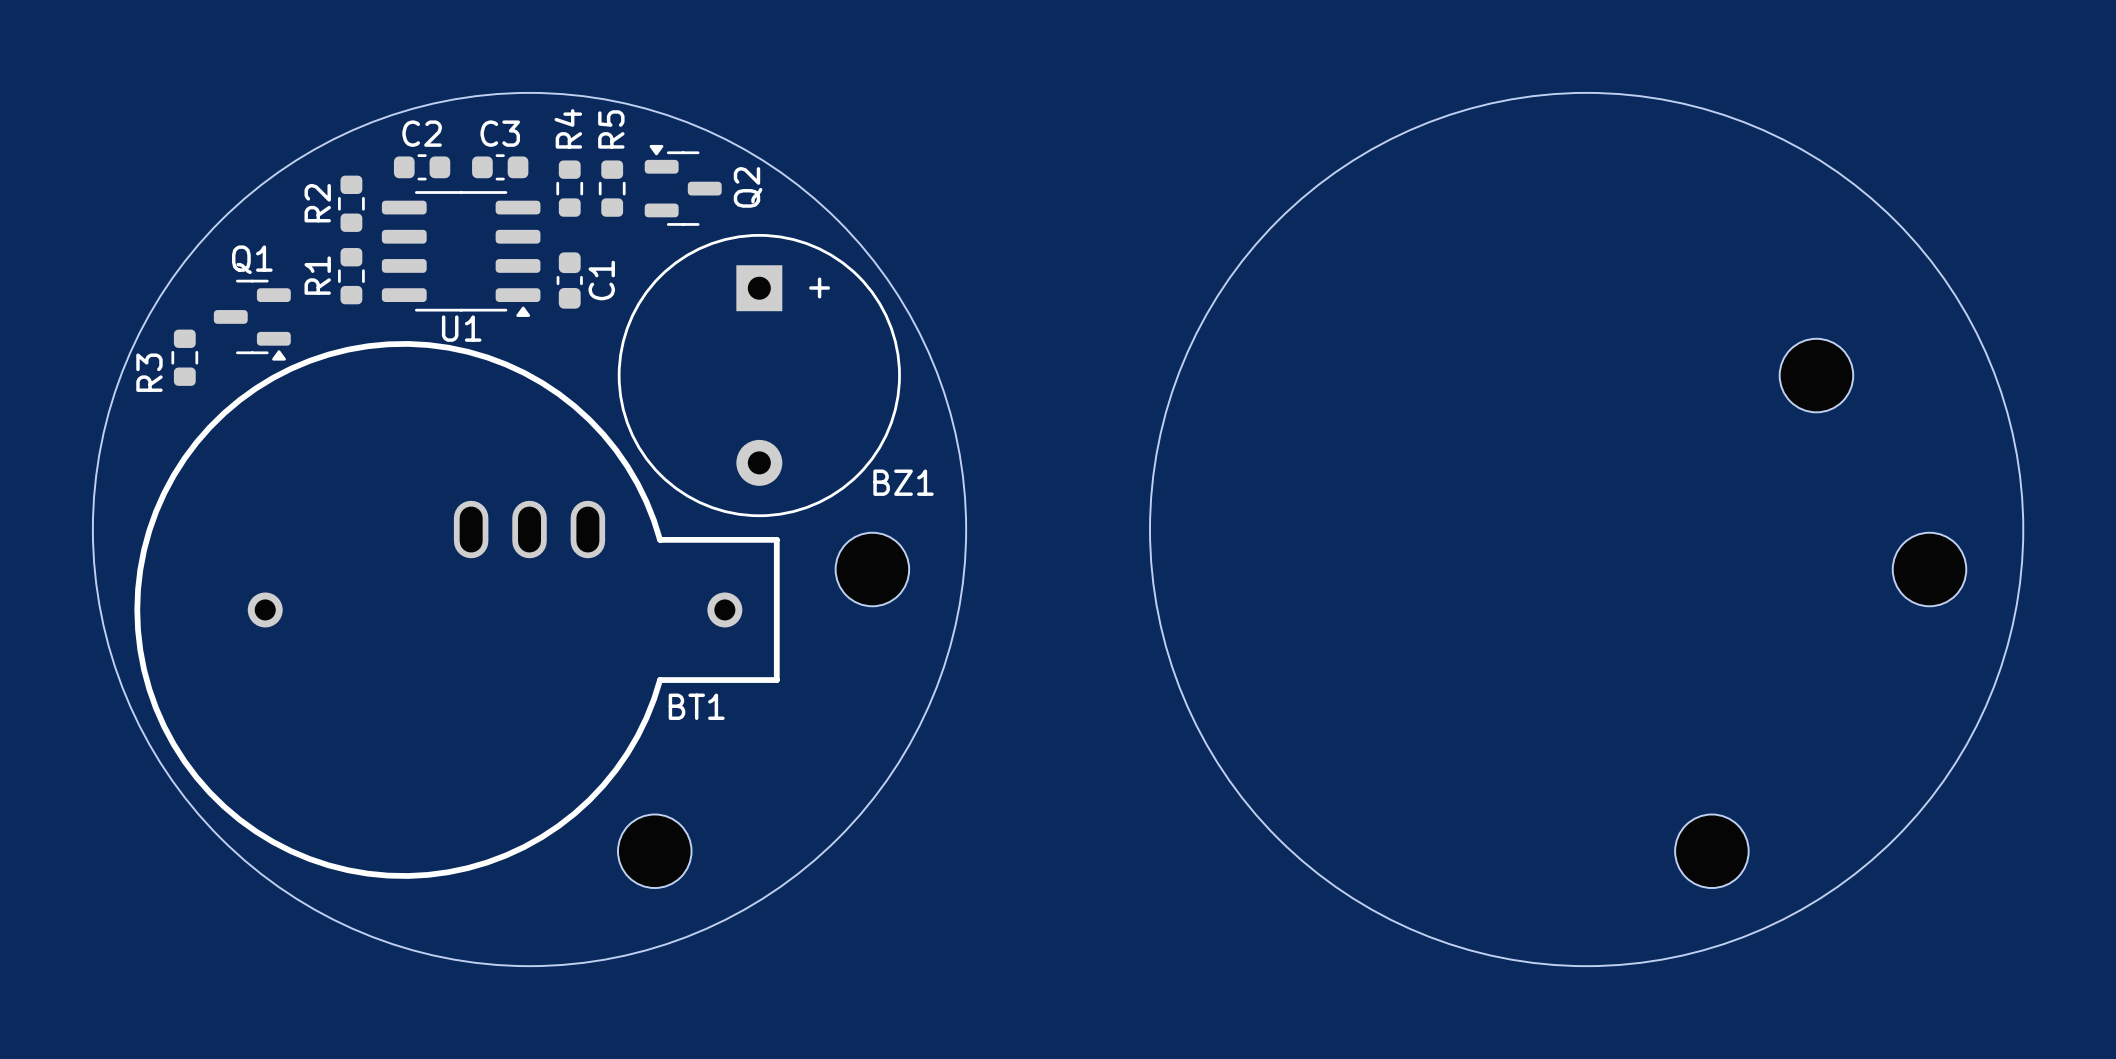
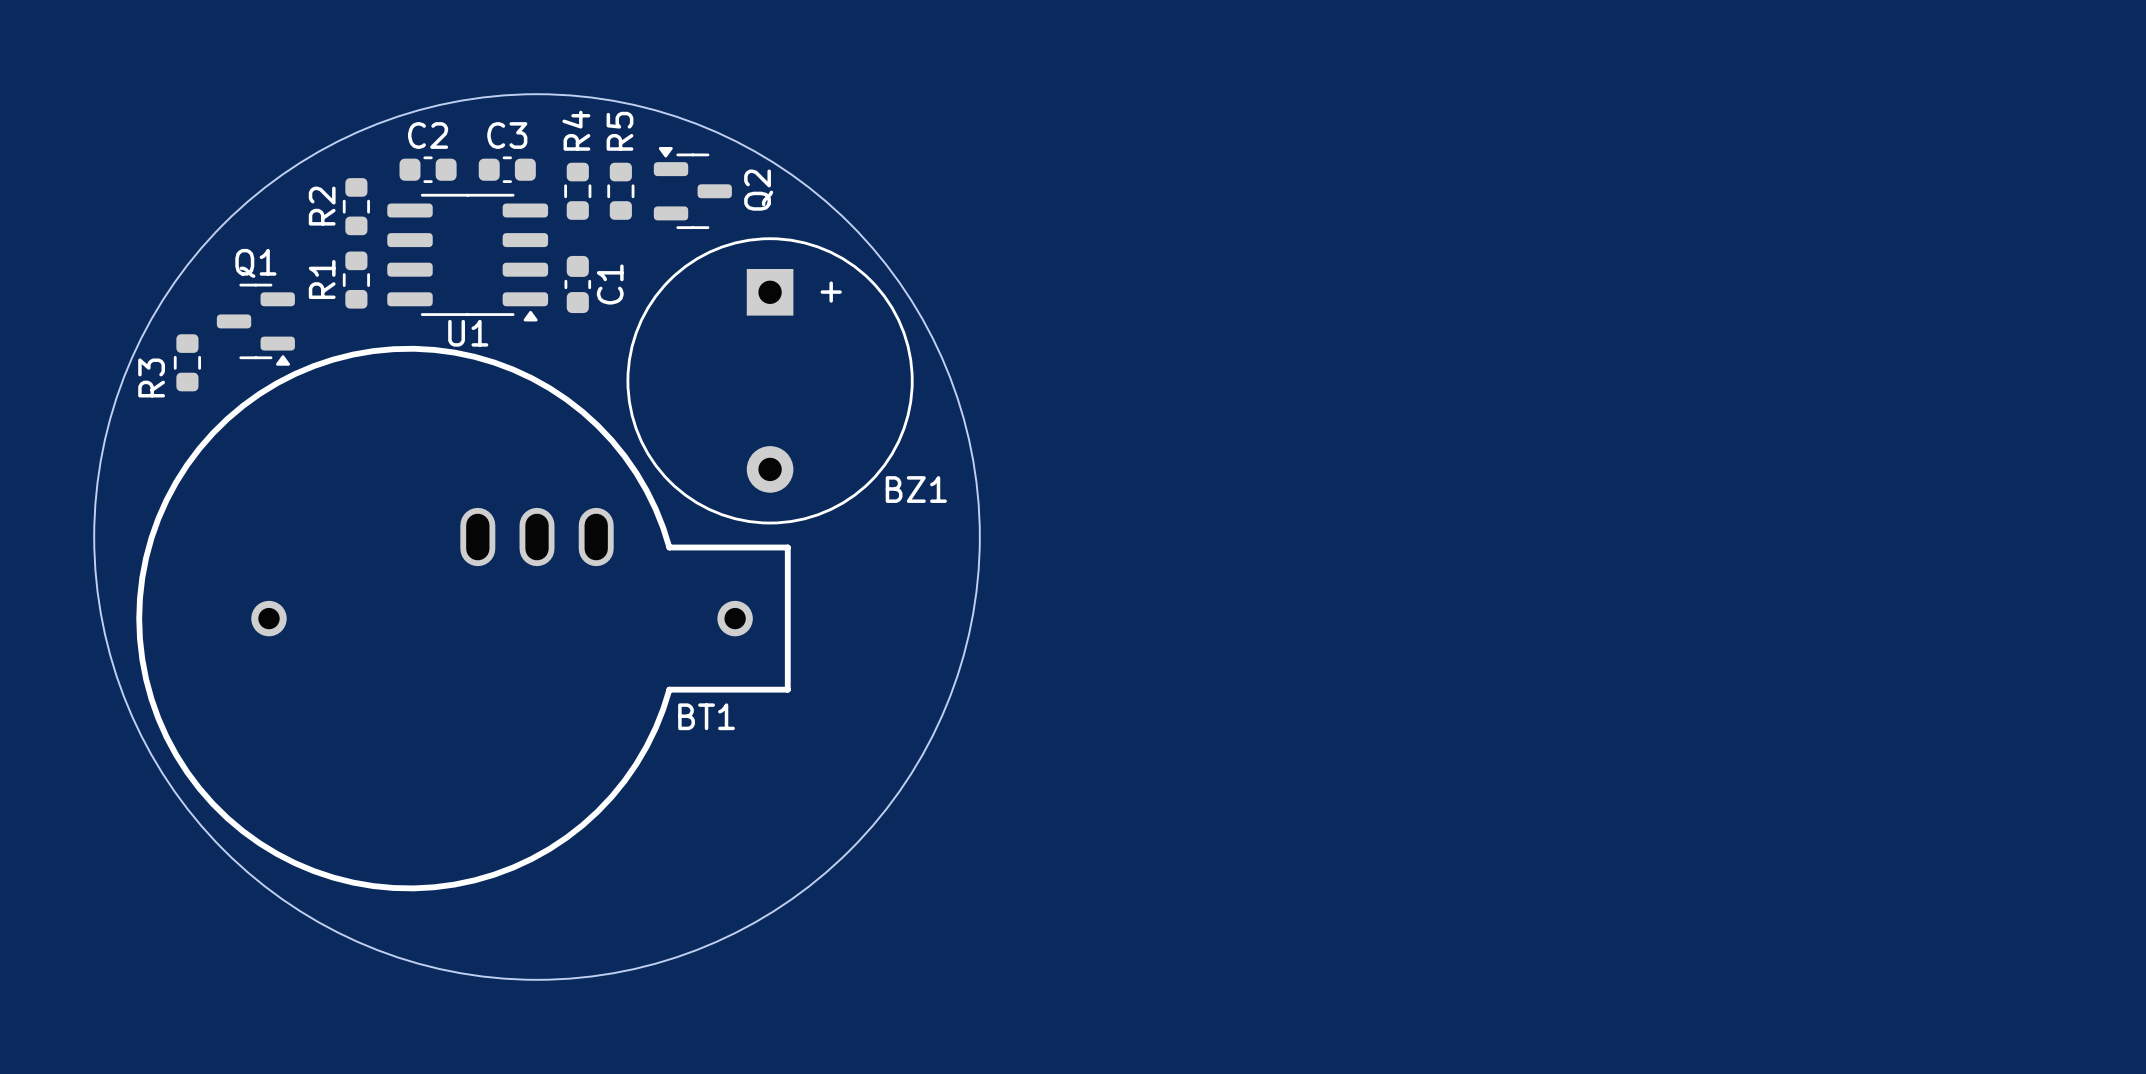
round board edge: [1149, 92, 2024, 967] -> none
part: (1816, 375) -> none
part: (872, 569) -> none
part: (1929, 569) -> none
part: (654, 851) -> none
part: (1711, 851) -> none

